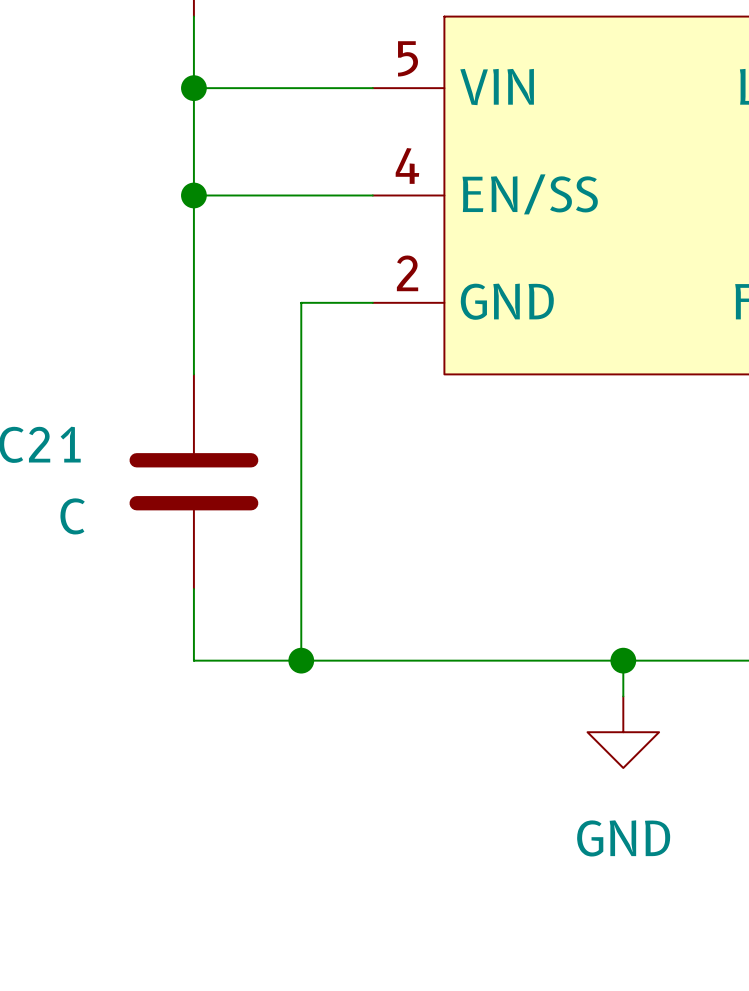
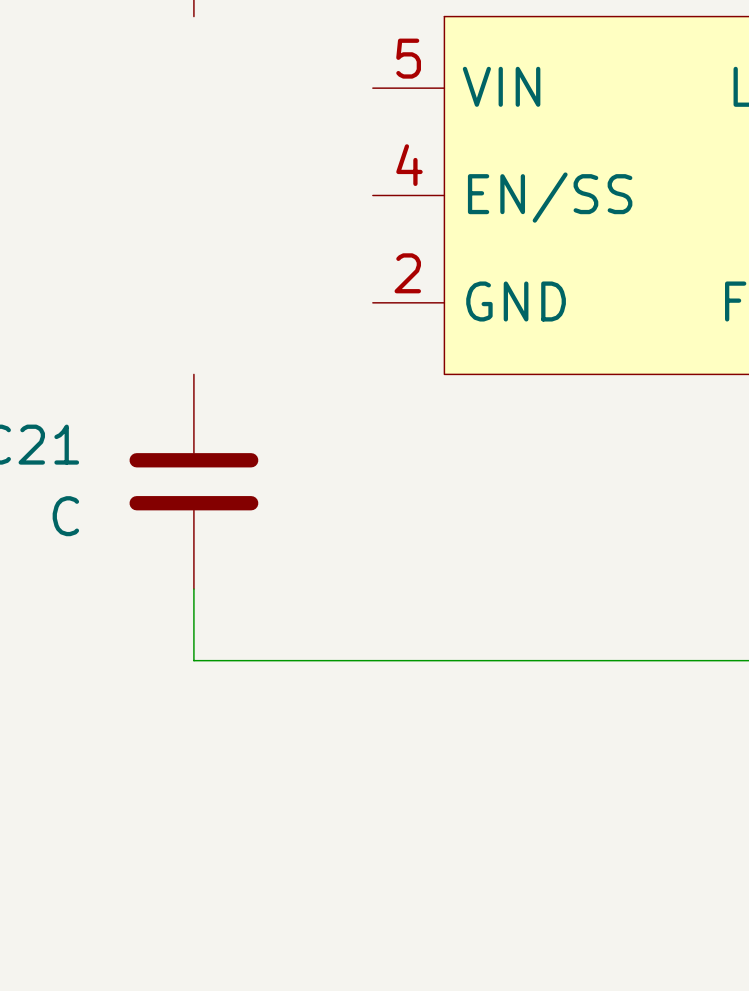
wire: (193, 16) (193, 374) -> none
wire: (193, 88) (372, 88) -> none
junction: (193, 88) -> none
wire: (193, 195) (372, 195) -> none
junction: (193, 195) -> none
wire: (372, 302) (301, 302) (301, 660) -> none
junction: (301, 660) -> none
wire: (623, 660) (623, 696) -> none
junction: (623, 660) -> none
power symbol: GND (623, 732) -> none

